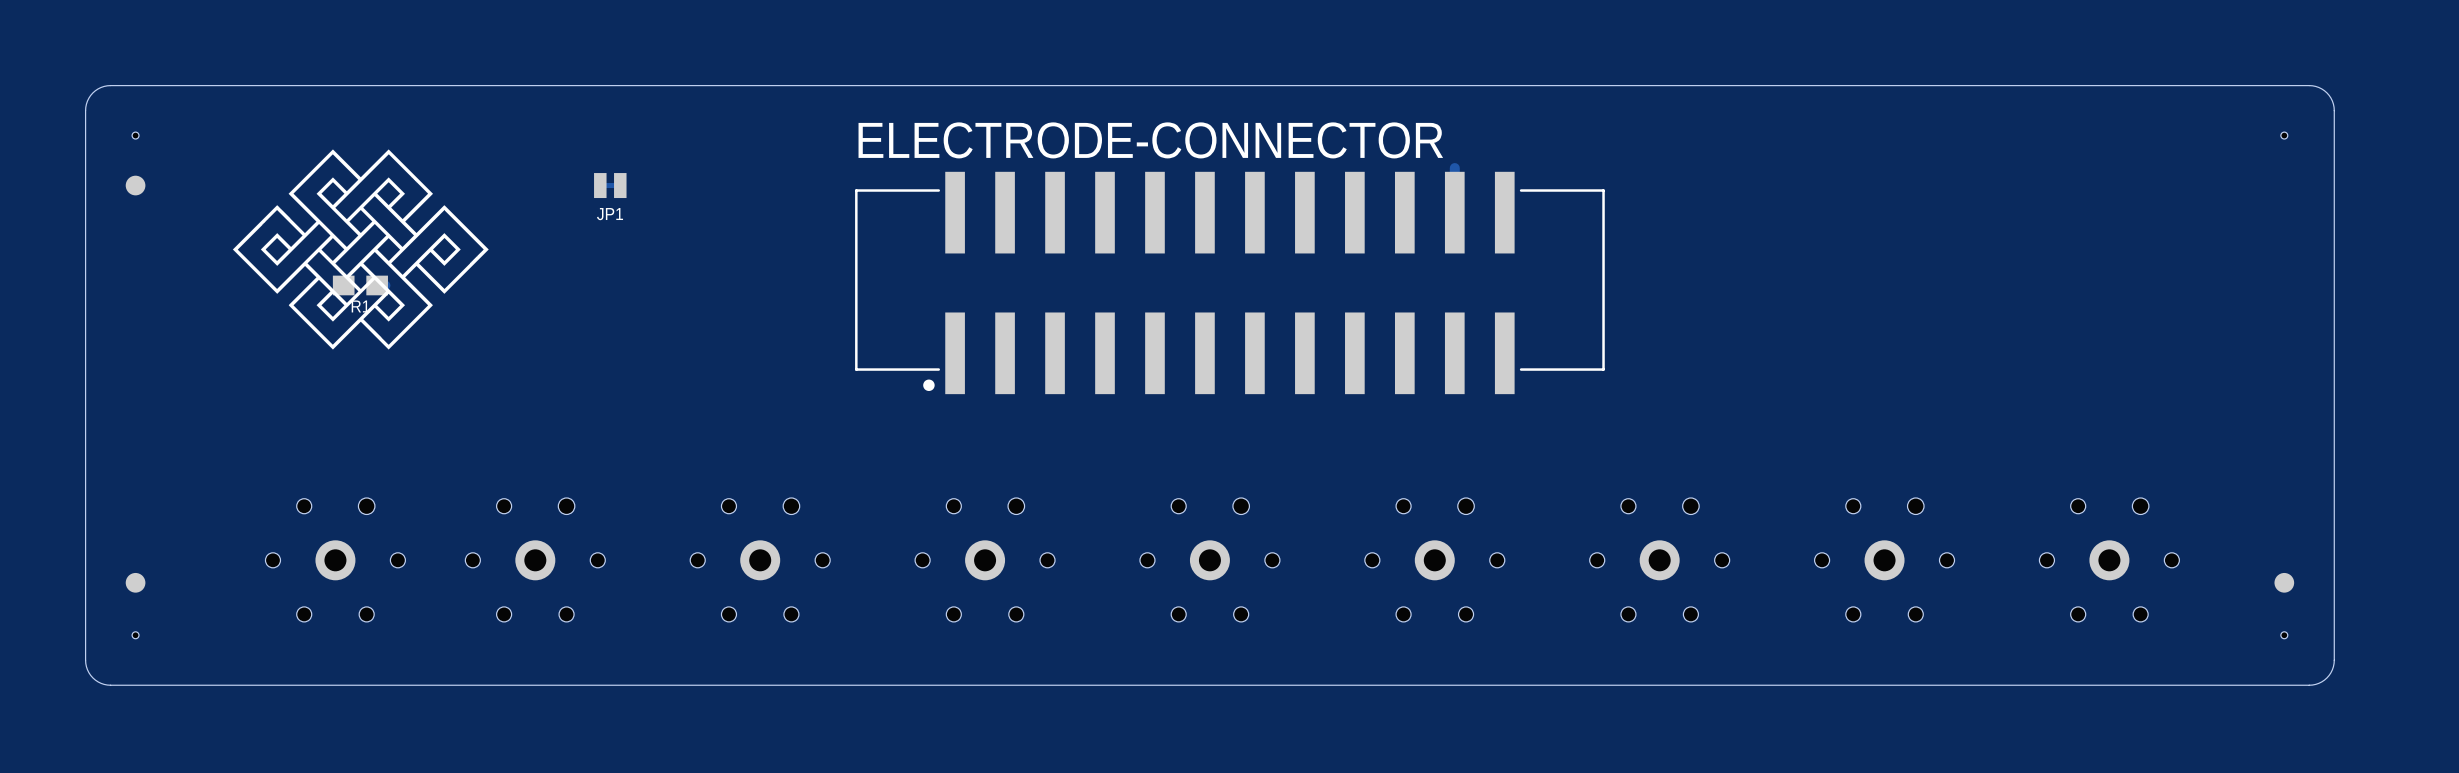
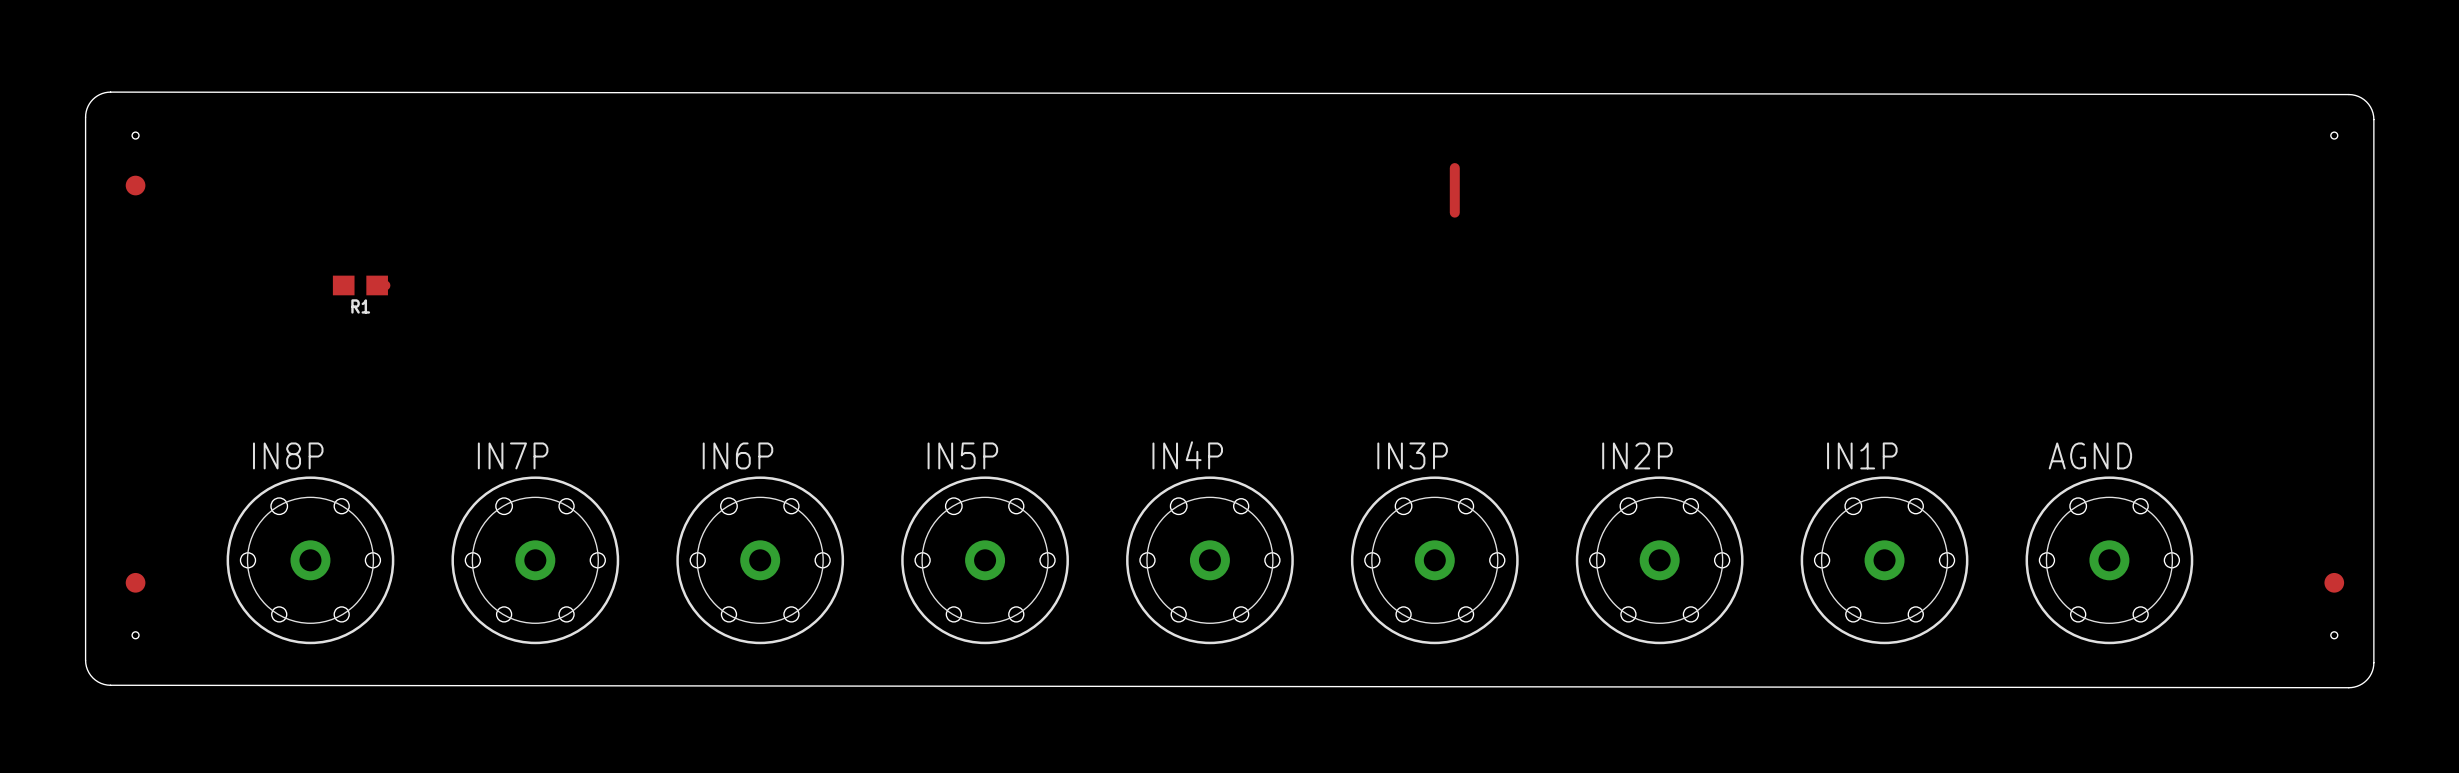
board edge: (85, 117) (86, 104) (90, 95) (98, 88) (110, 85) (2309, 85) (2318, 87) (2326, 92) (2332, 101) (2334, 110) (2334, 660) (2329, 675) (2315, 684) (110, 685) (101, 683) (92, 677) (87, 669) (85, 660) -> (85, 117) (88, 106) (92, 99) (99, 94) (110, 92) (2355, 95) (2368, 104) (2373, 119) (2373, 662) (2371, 673) (2366, 680) (2359, 685) (2348, 687) (110, 685) (100, 683) (92, 677) (87, 669) (85, 660)
hole position: (2284, 135) -> (2334, 135)
drawing: [232, 149, 489, 350] -> none
JP1: (610, 185) -> none
ELECTRODE-CONNECTOR: (1229, 282) -> none
part: (335, 559) -> none
part: (535, 559) -> none
part: (760, 559) -> none
IN3P side: bottom (985, 559) -> top (1434, 560)
IN4P side: bottom (1209, 559) -> top (1209, 560)
IN5P side: bottom (1434, 559) -> top (985, 560)
part: (1659, 559) -> none
part: (1884, 559) -> none
part: (2109, 559) -> none
IN8P: none -> (310, 560)
IN7P: none -> (535, 560)
IN6P: none -> (760, 560)
IN2P: none -> (1659, 560)
IN1P: none -> (1884, 560)
AGND: none -> (2109, 560)
part position: (2284, 582) -> (2334, 582)
hole position: (2284, 635) -> (2334, 635)

